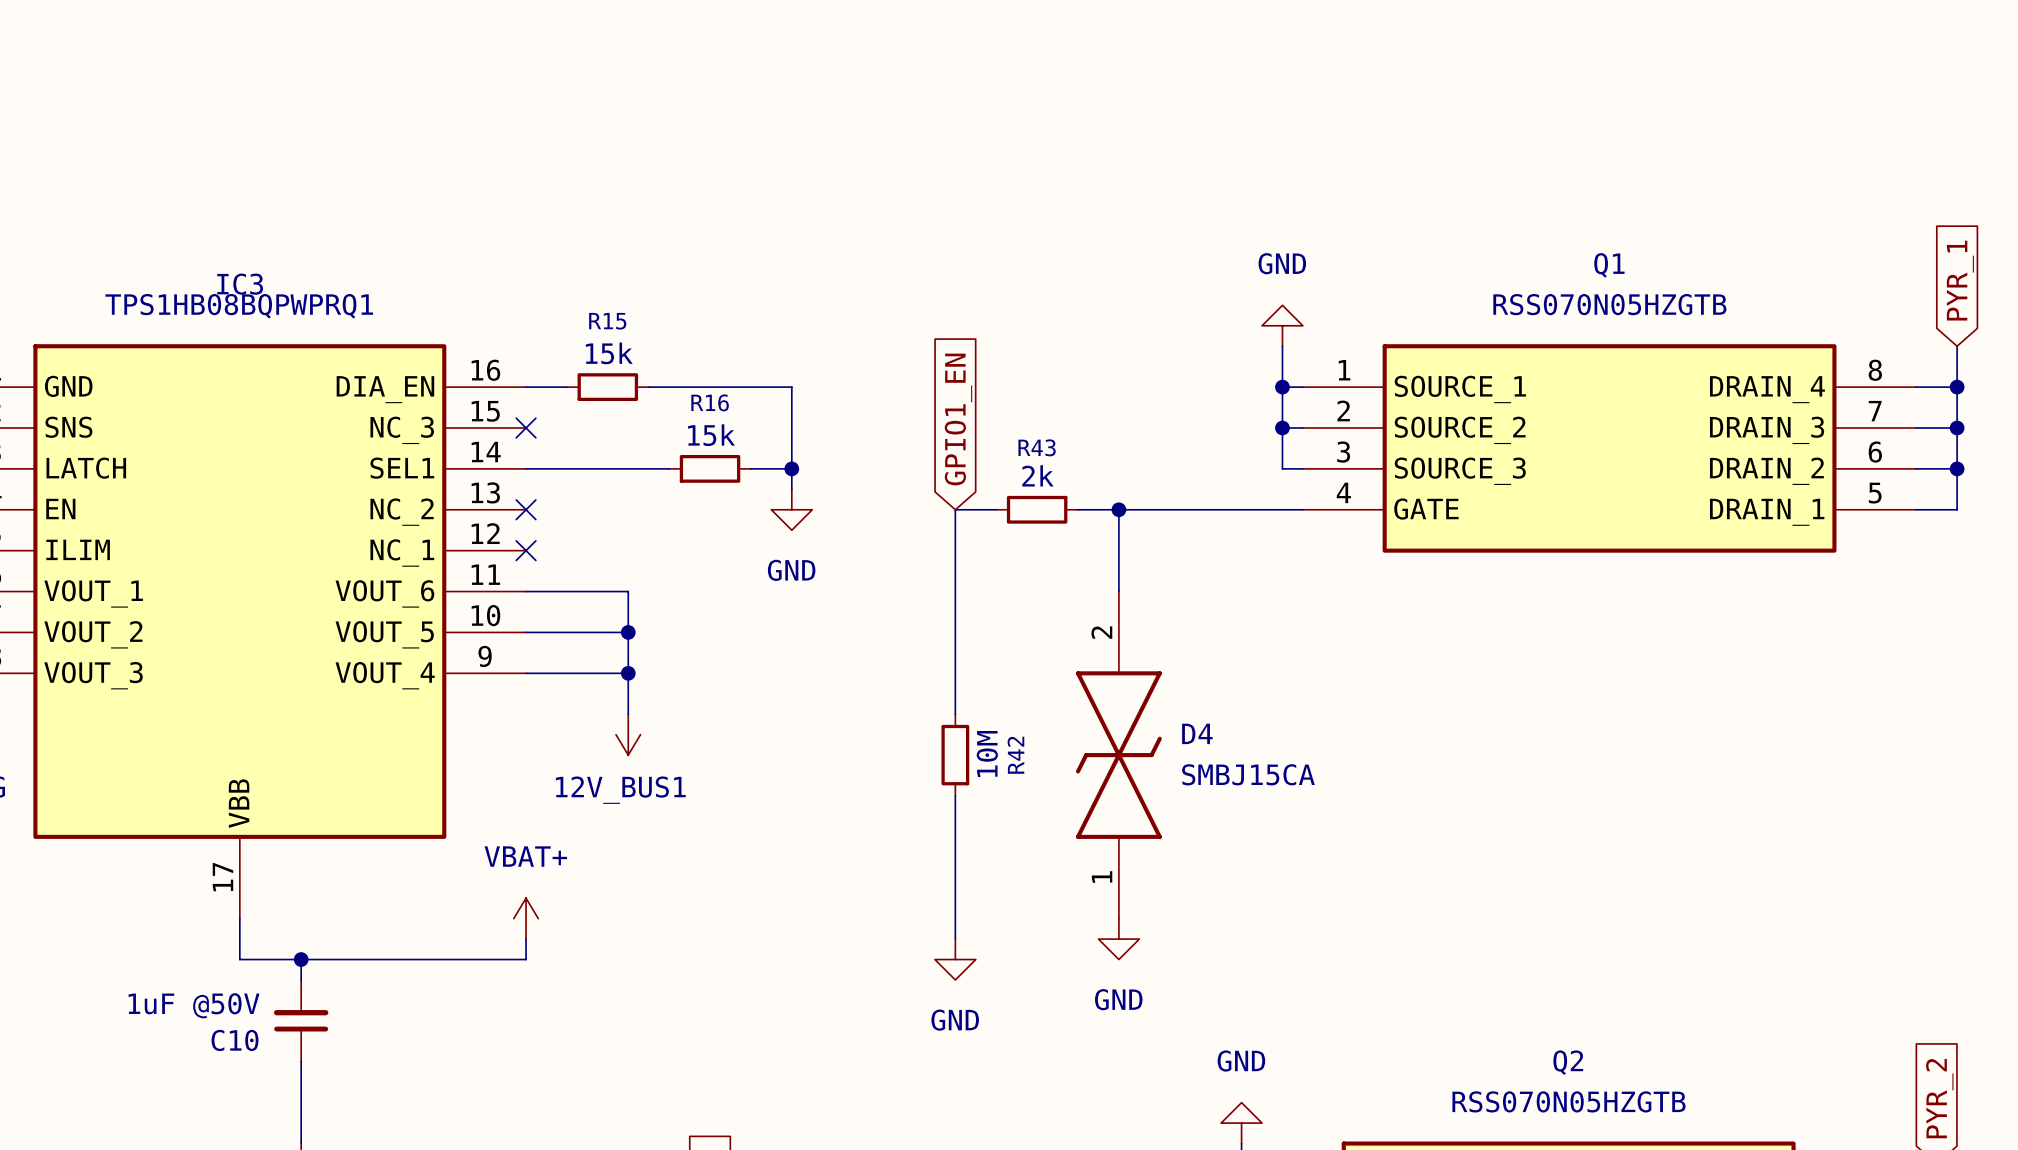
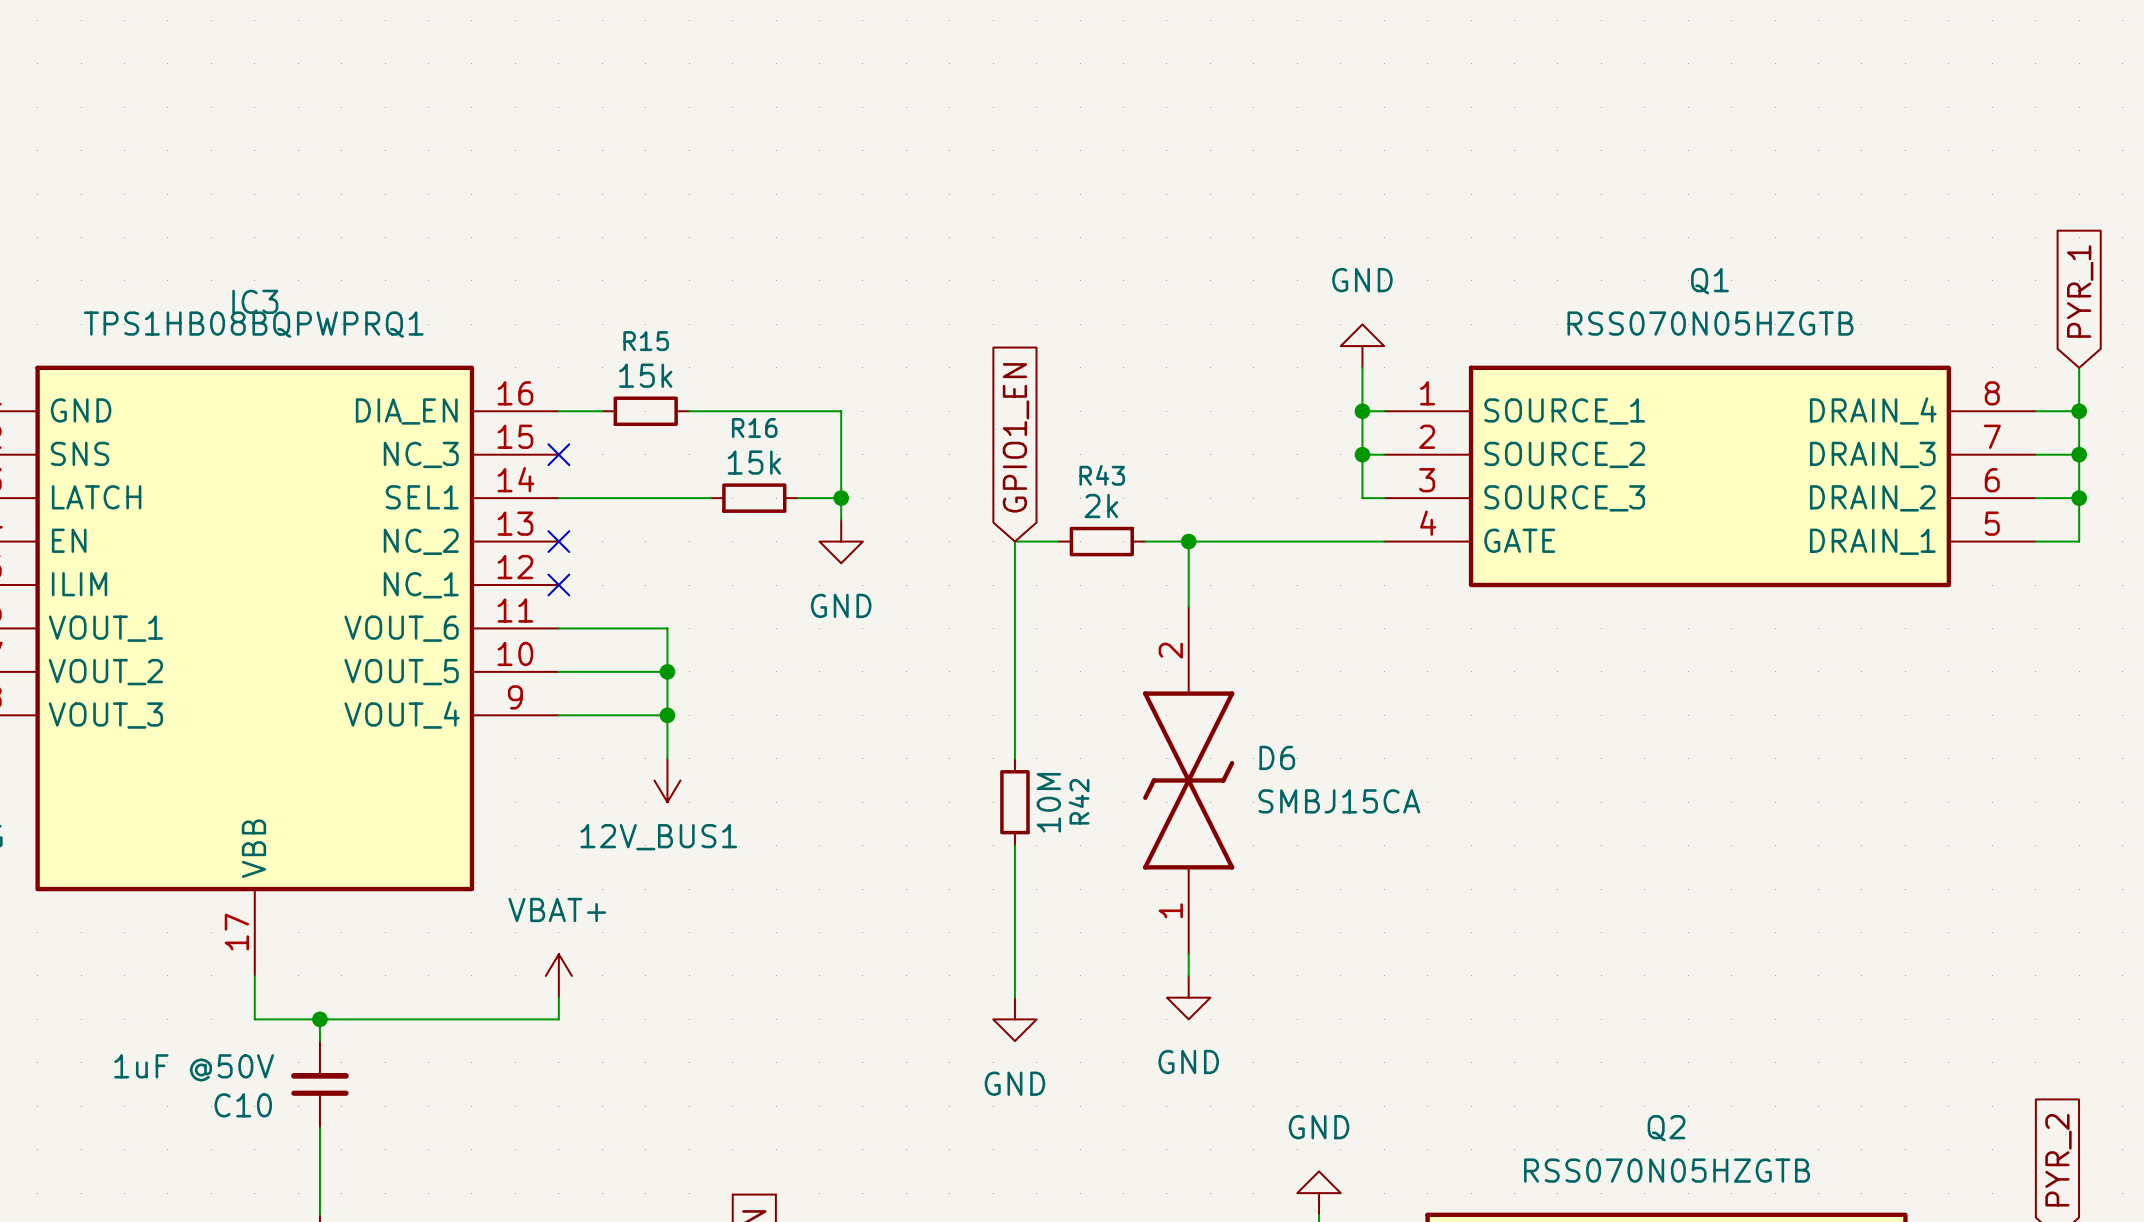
D6: none -> SMBJ15CA (1188, 780)
D4: SMBJ15CA (1118, 755) -> none

